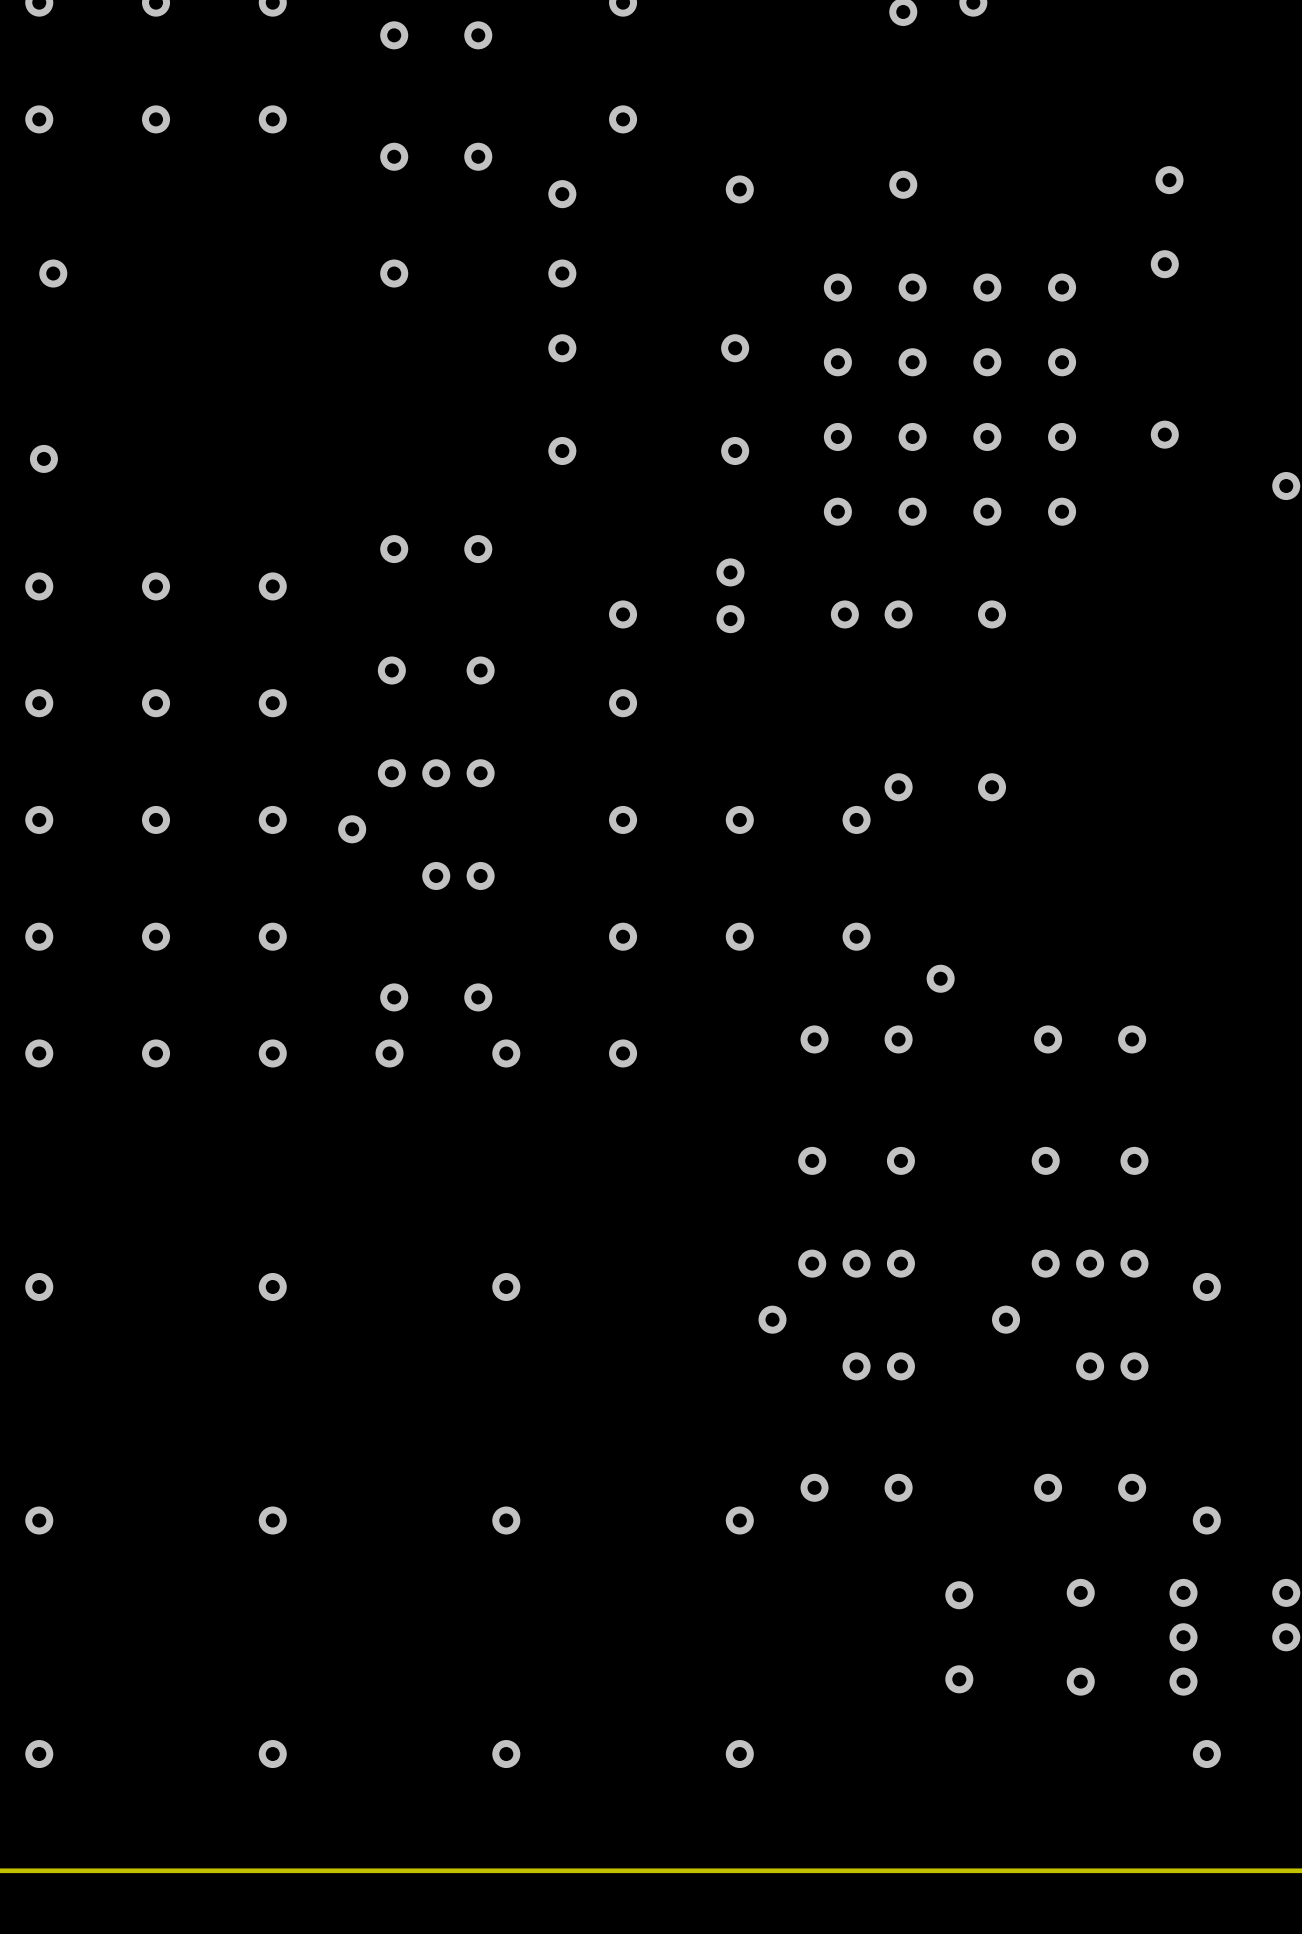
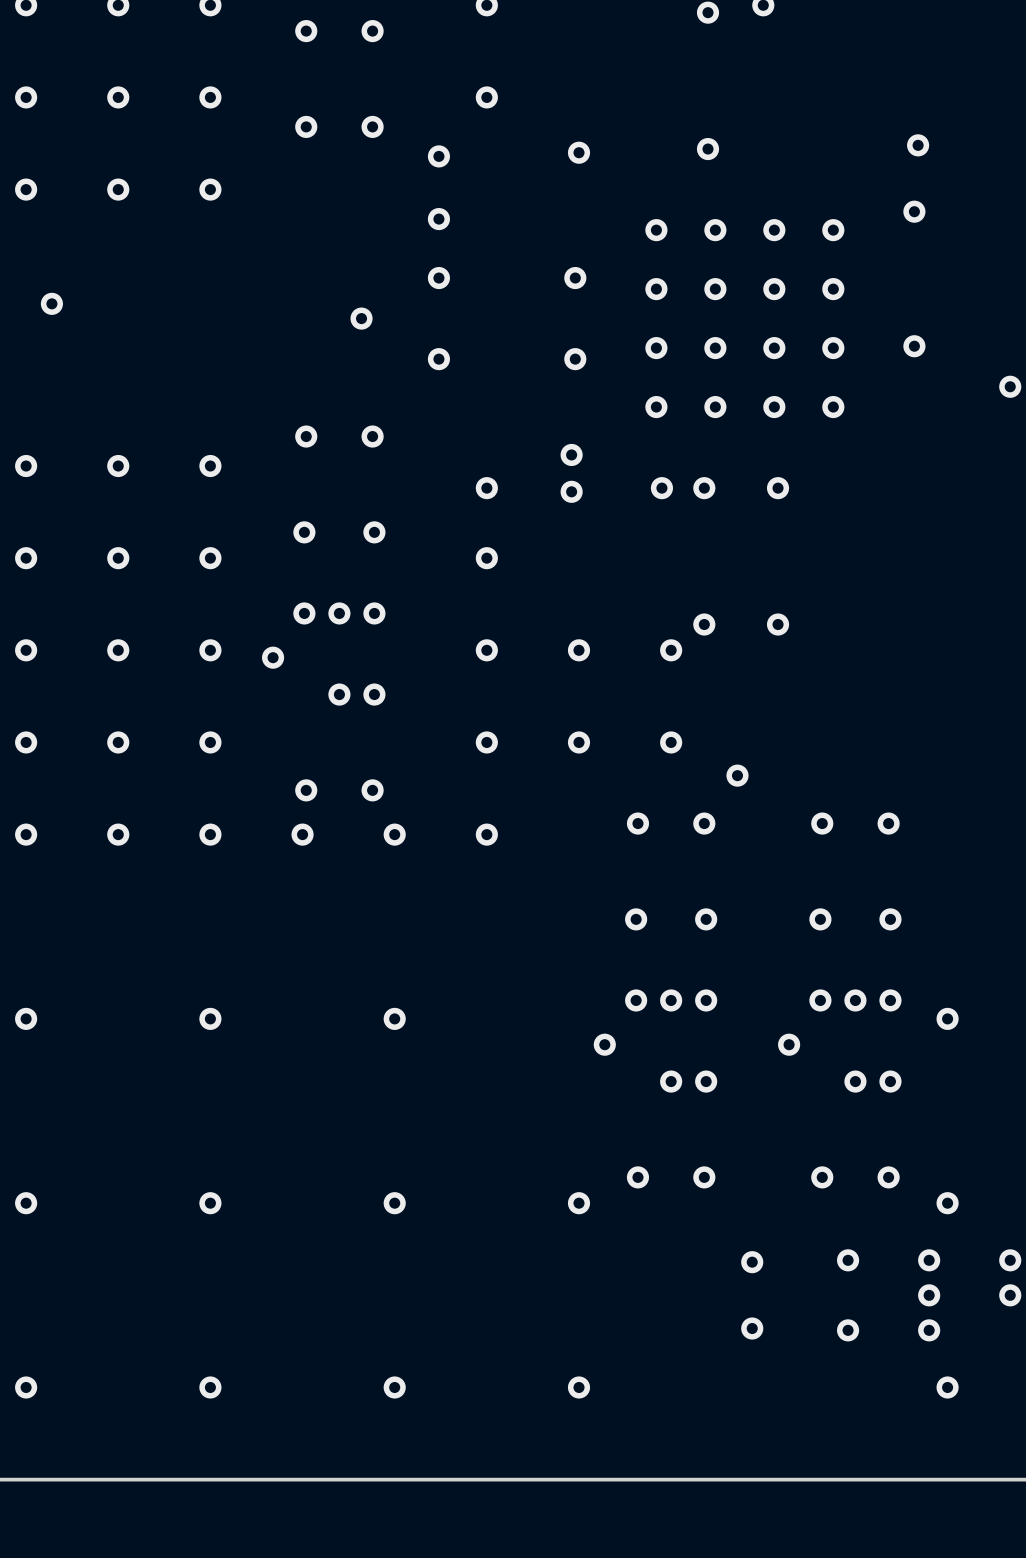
via: none -> (118, 189)
via: none -> (210, 189)
via position: (53, 273) -> (26, 189)
via: (394, 273) -> none
via: none -> (51, 303)
via: none -> (361, 318)
via: (43, 458) -> none

